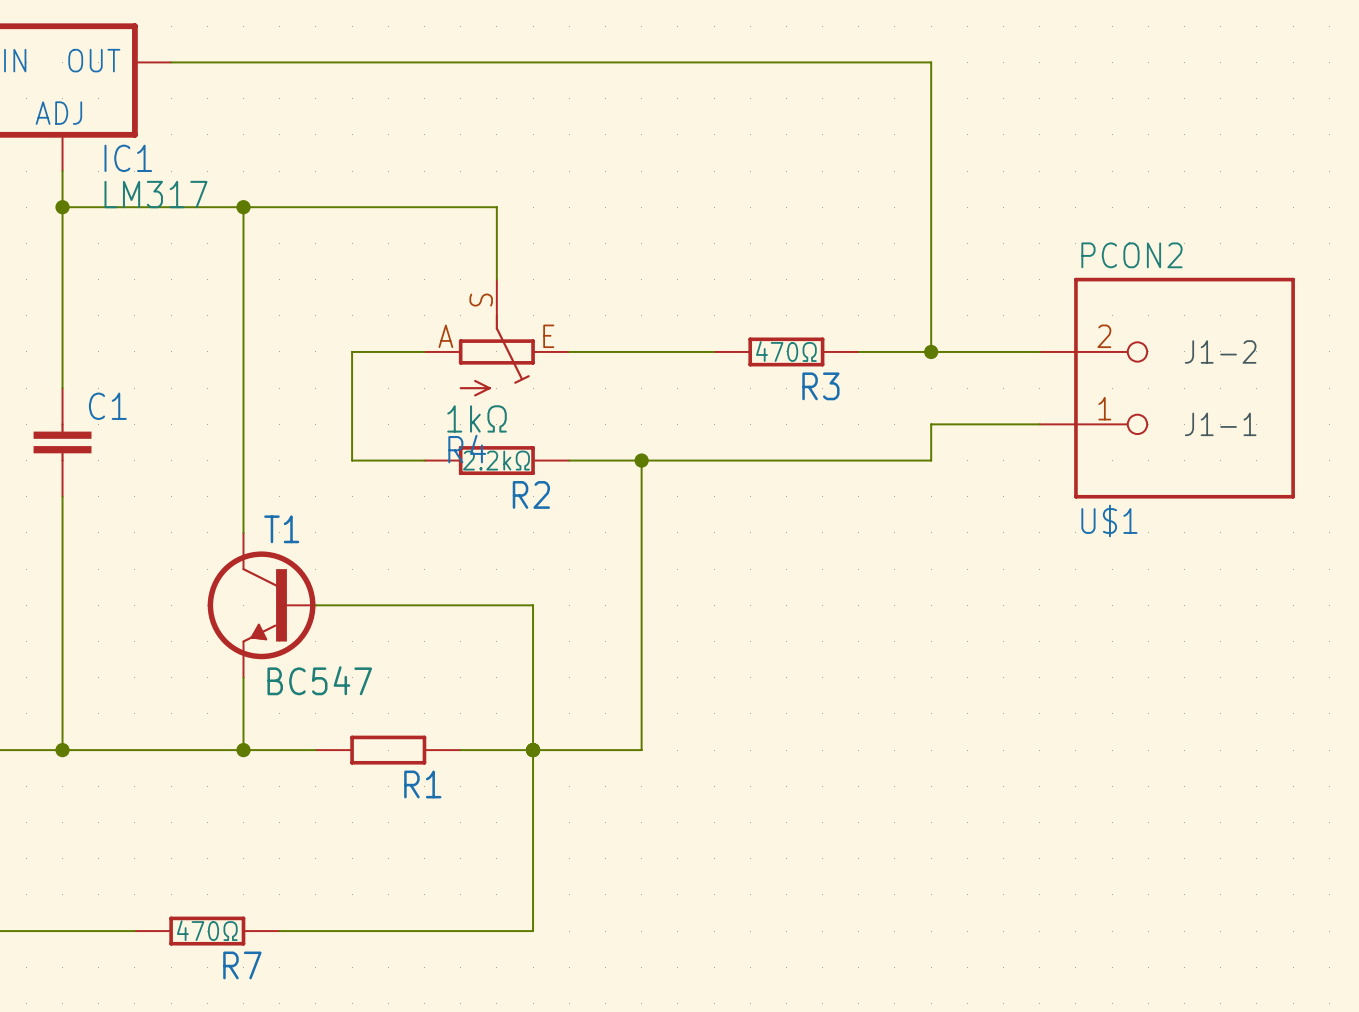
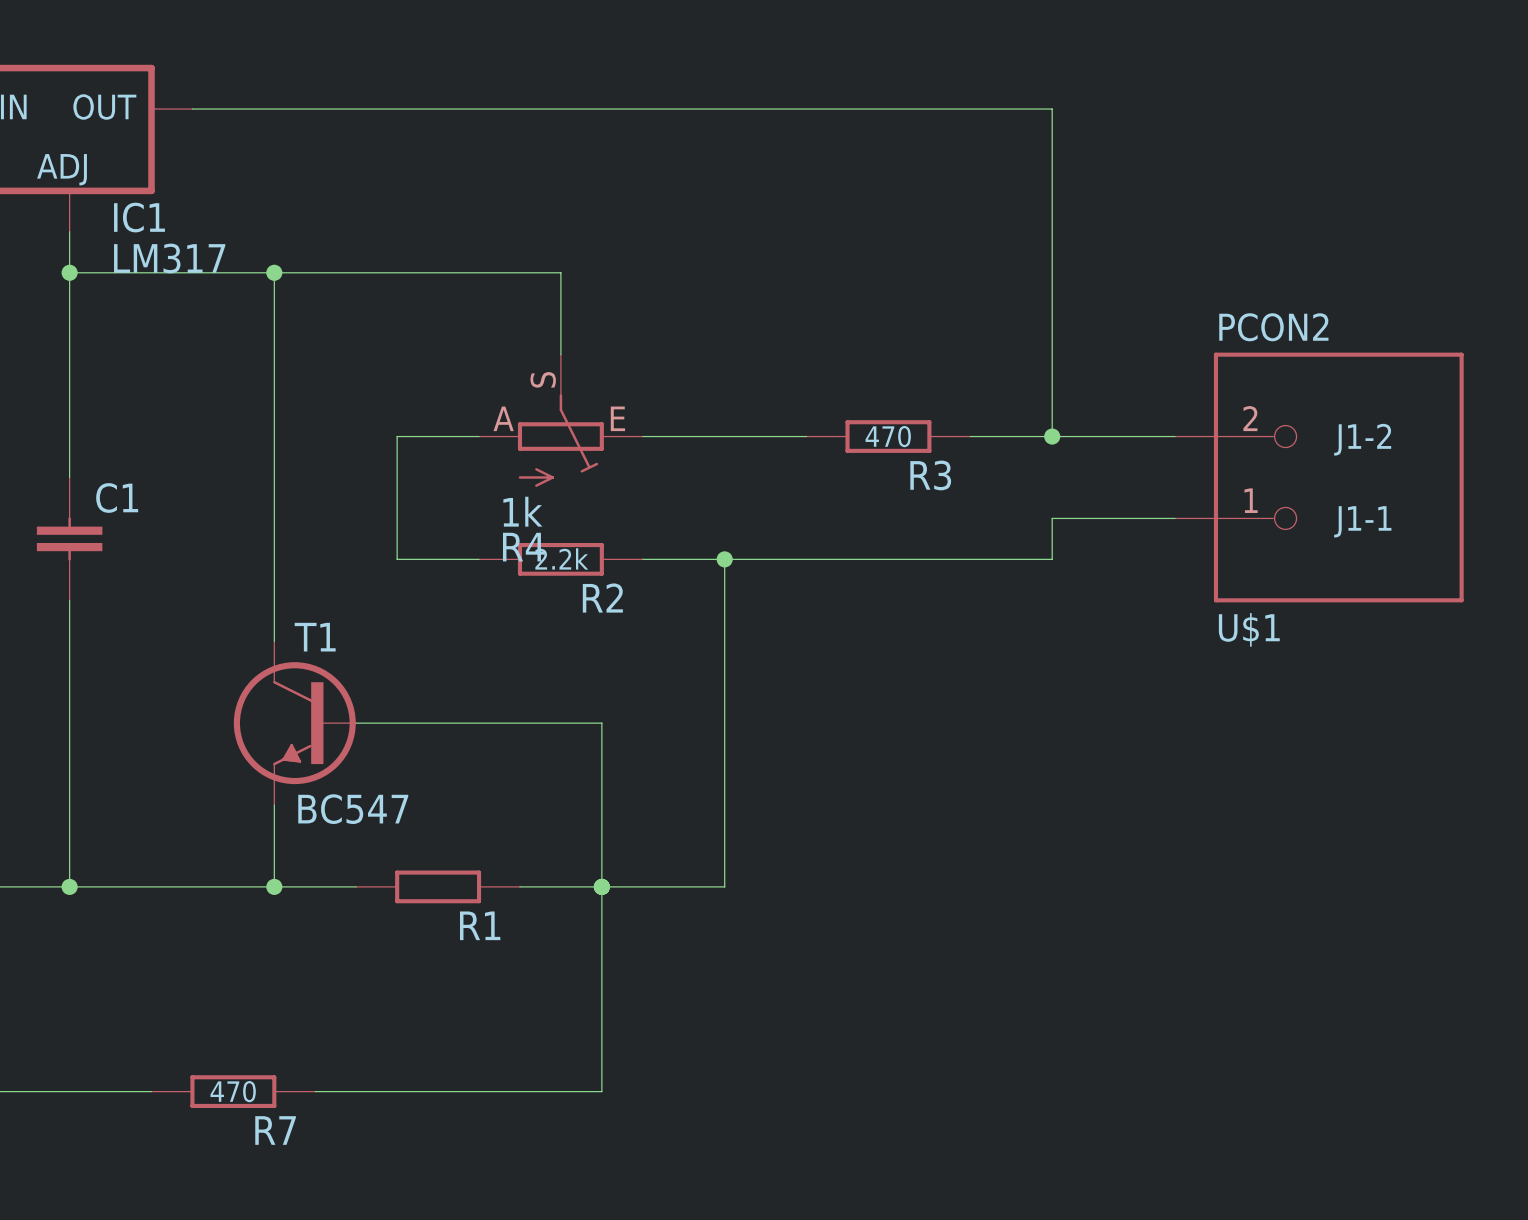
R3 value: 470Ω (786, 351) -> 470 (888, 436)
R4 value: 1kΩ (477, 418) -> 1k (522, 511)
R2 value: 2.2kΩ (496, 460) -> 2.2k (561, 558)
R7 value: 470Ω (207, 930) -> 470 (233, 1091)

